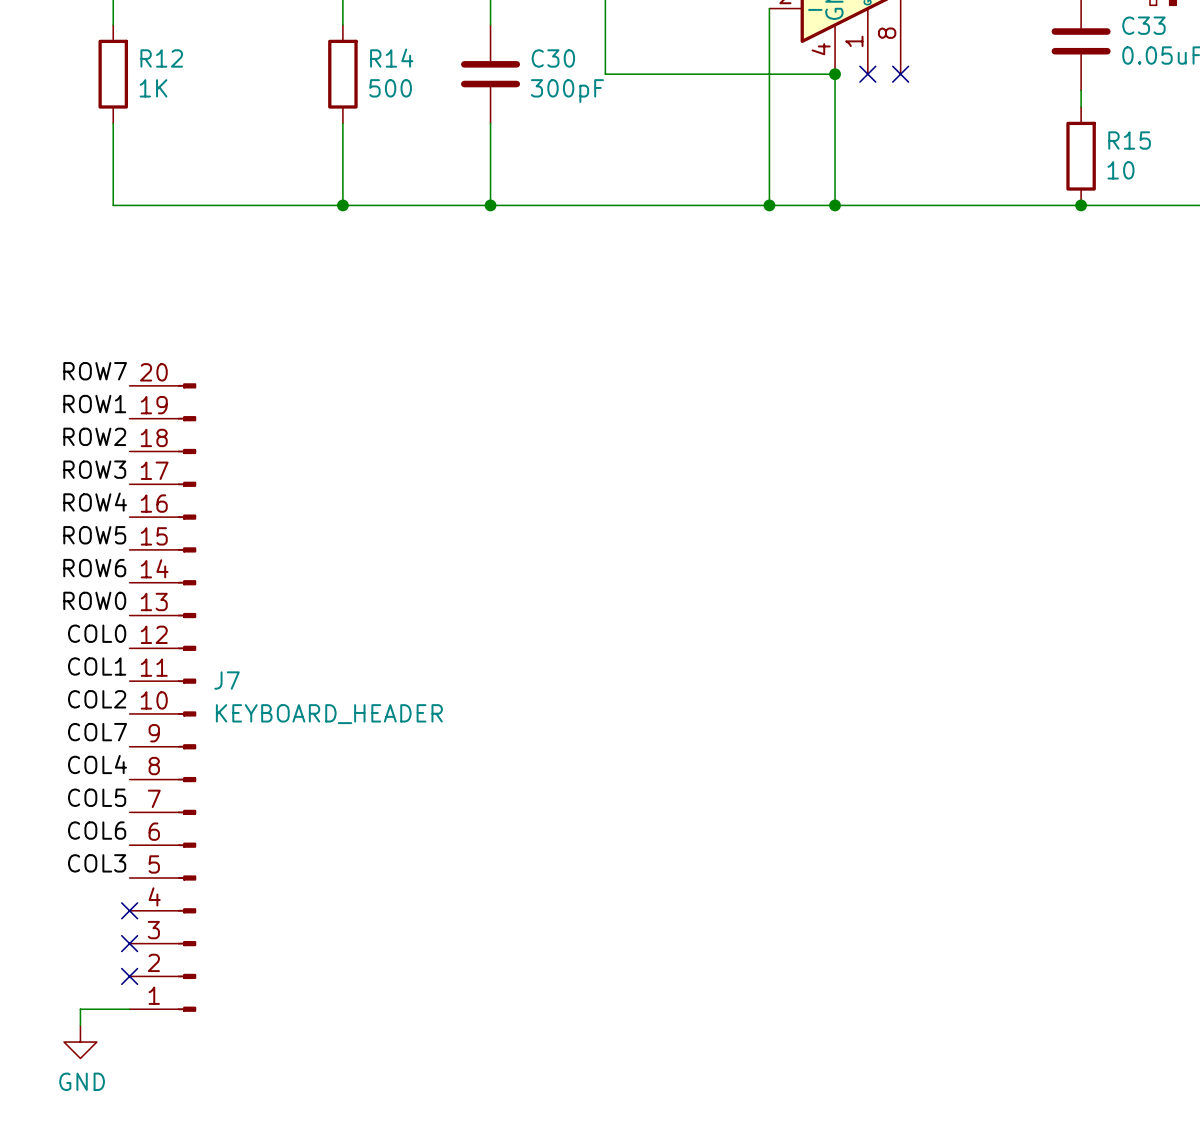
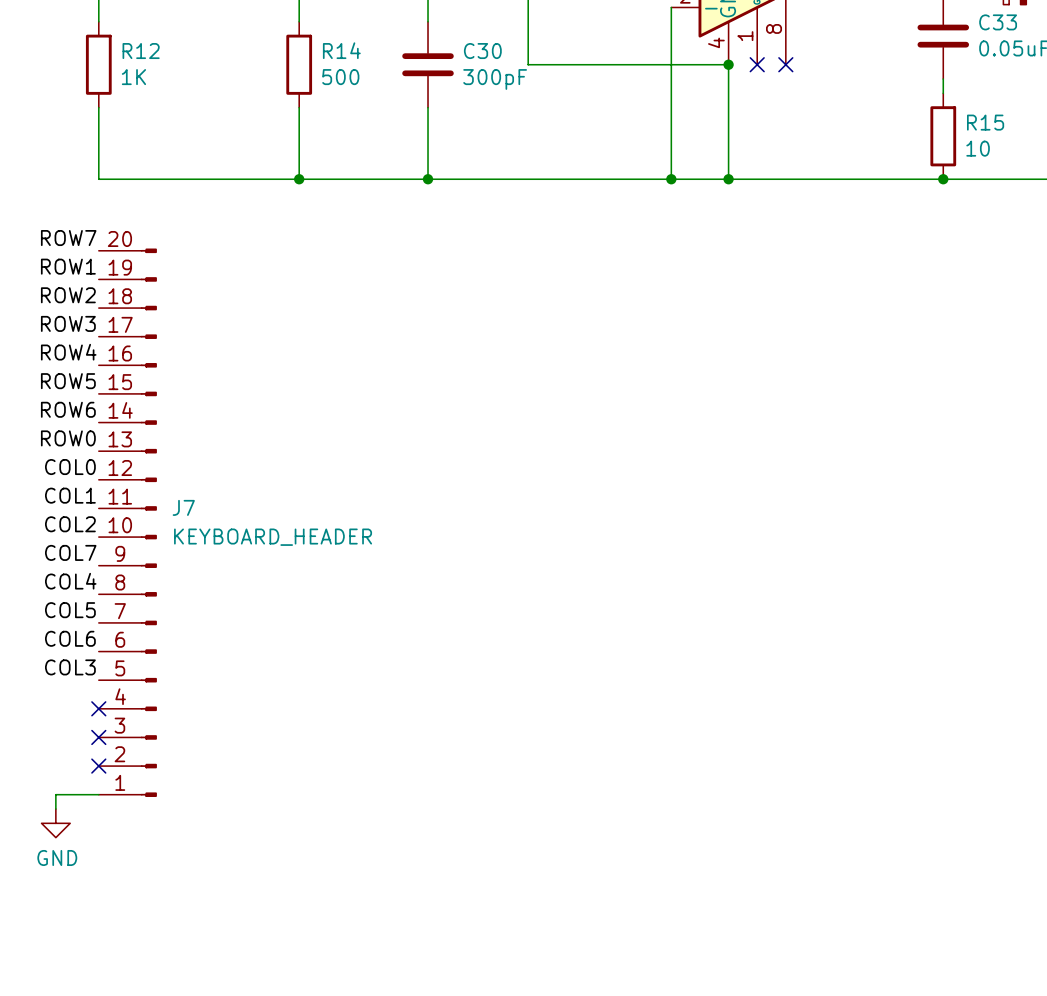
label position: ROW7 (95, 371) -> ROW7 (68, 238)
label position: ROW1 (94, 404) -> ROW1 (68, 266)
label position: ROW2 (94, 436) -> ROW2 (68, 295)
label position: ROW3 (94, 469) -> ROW3 (68, 323)
label position: ROW4 (95, 502) -> ROW4 (68, 352)
label position: ROW5 (94, 535) -> ROW5 (68, 381)
label position: ROW6 (94, 568) -> ROW6 (68, 409)
label position: ROW0 (94, 600) -> ROW0 (68, 438)
label position: COL0 (97, 633) -> COL0 (70, 467)
label position: COL1 (97, 666) -> COL1 (70, 495)
J7 position: (162, 697) -> (127, 522)
label position: COL2 (97, 699) -> COL2 (70, 524)
label position: COL7 (97, 732) -> COL7 (70, 552)
label position: COL4 (97, 764) -> COL4 (70, 581)
label position: COL5 (97, 797) -> COL5 (70, 610)
no-connect mark: none -> (98, 708)
label position: COL6 (97, 830) -> COL6 (70, 638)
no-connect mark: none -> (98, 737)
label position: COL3 (97, 863) -> COL3 (70, 667)
no-connect mark: none -> (98, 766)
no-connect mark: (129, 910) -> none
no-connect mark: (129, 943) -> none
no-connect mark: (129, 976) -> none
wire: (129, 1009) (80, 1009) (80, 1025) -> (98, 794) (55, 794) (55, 809)
power symbol position: GND (80, 1042) -> GND (55, 823)

